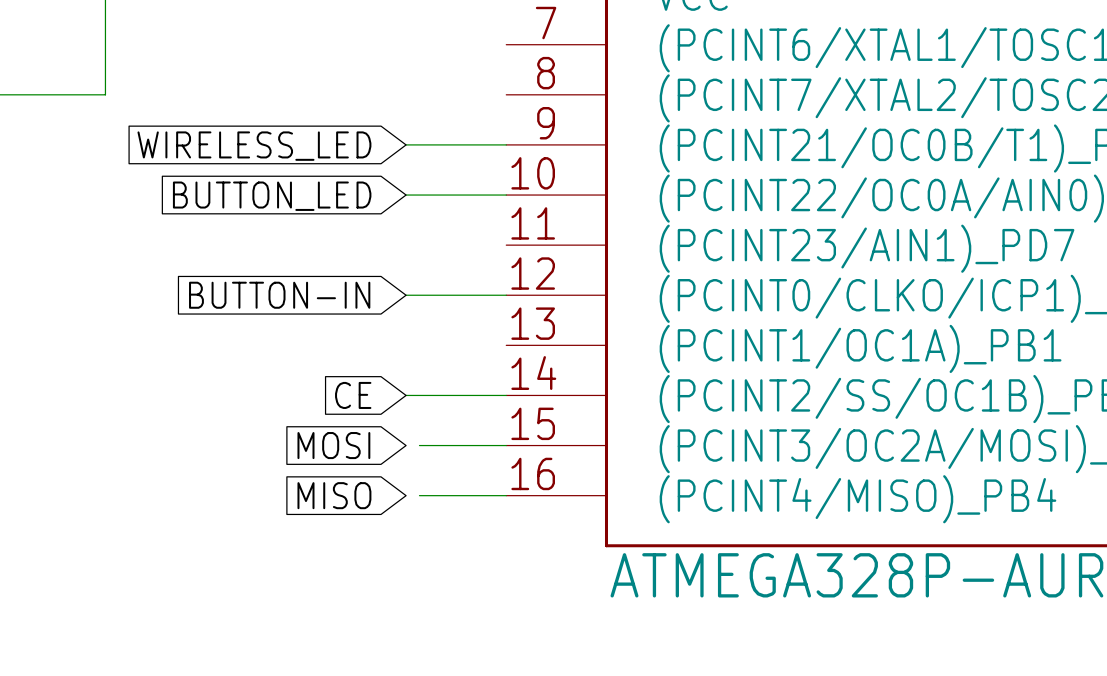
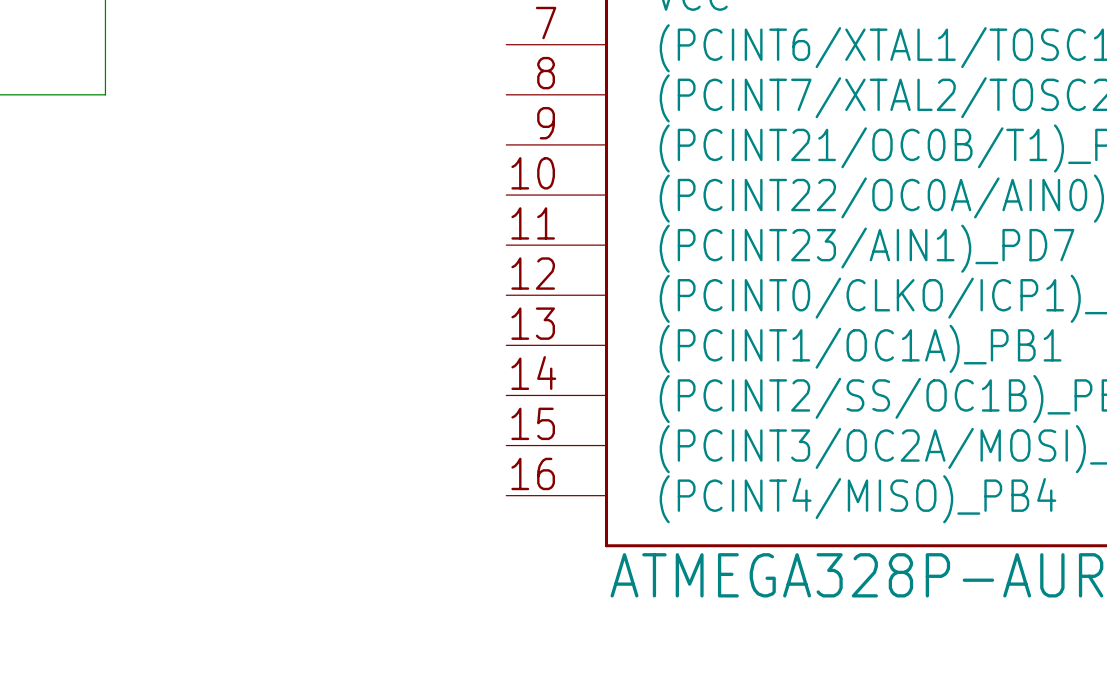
wire: (406, 144) (506, 144) -> none
global label: WIRELESS_LED (254, 146) -> none
wire: (406, 195) (506, 195) -> none
global label: BUTTON_LED (272, 196) -> none
global label: BUTTON-IN (279, 295) -> none
wire: (406, 295) (506, 295) -> none
global label: CE (353, 395) -> none
wire: (406, 395) (506, 395) -> none
global label: MOSI (333, 445) -> none
wire: (419, 445) (506, 445) -> none
global label: MISO (334, 495) -> none
wire: (419, 495) (506, 495) -> none

